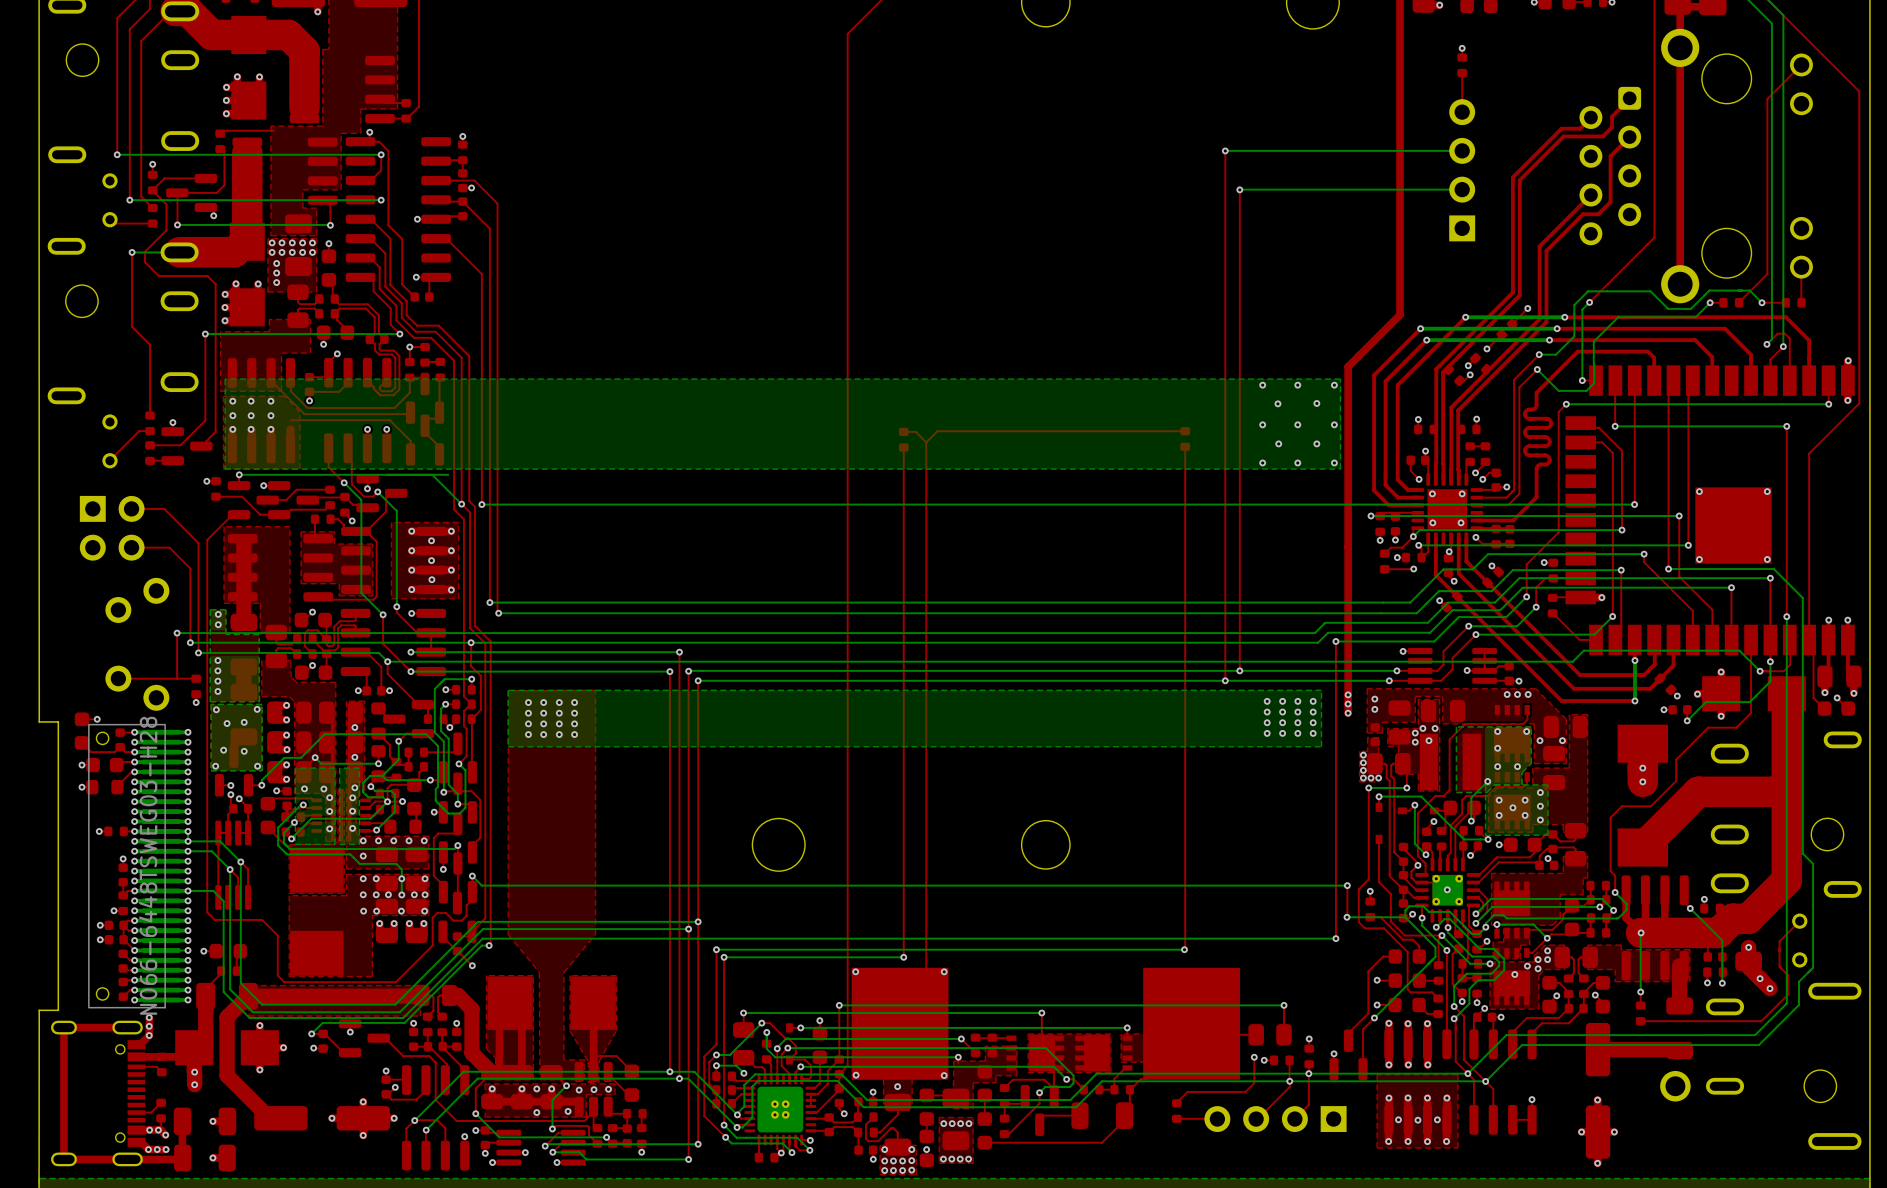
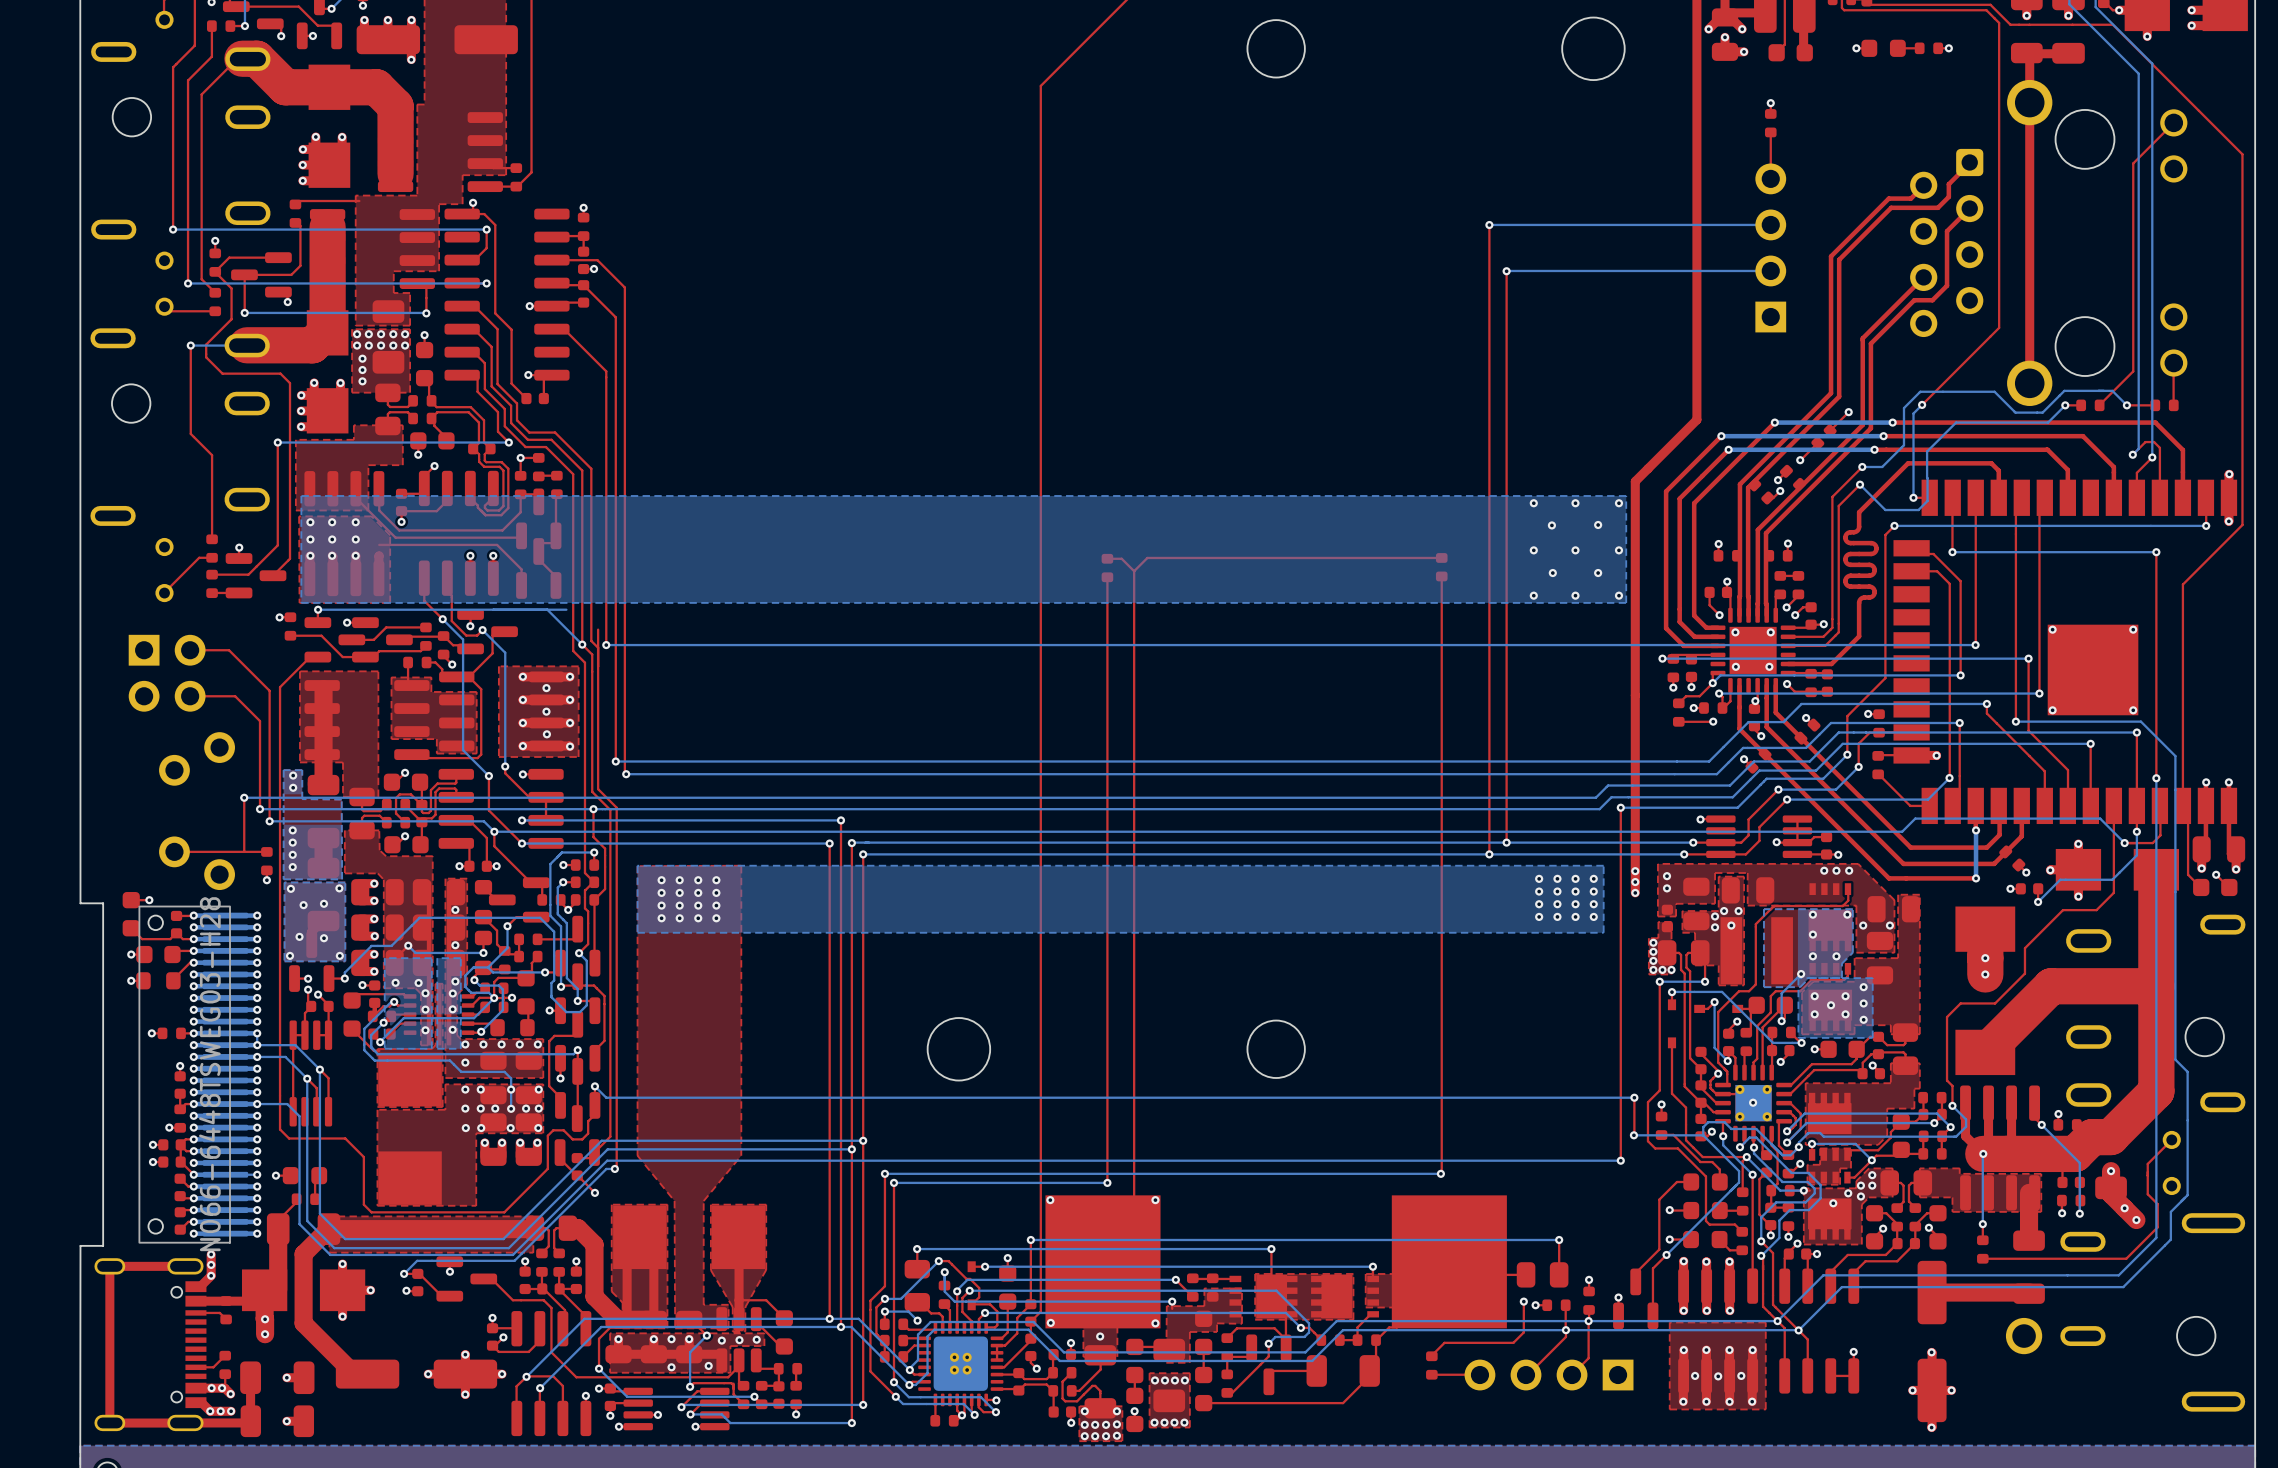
top track: none -> (598, 629) (598, 647)

